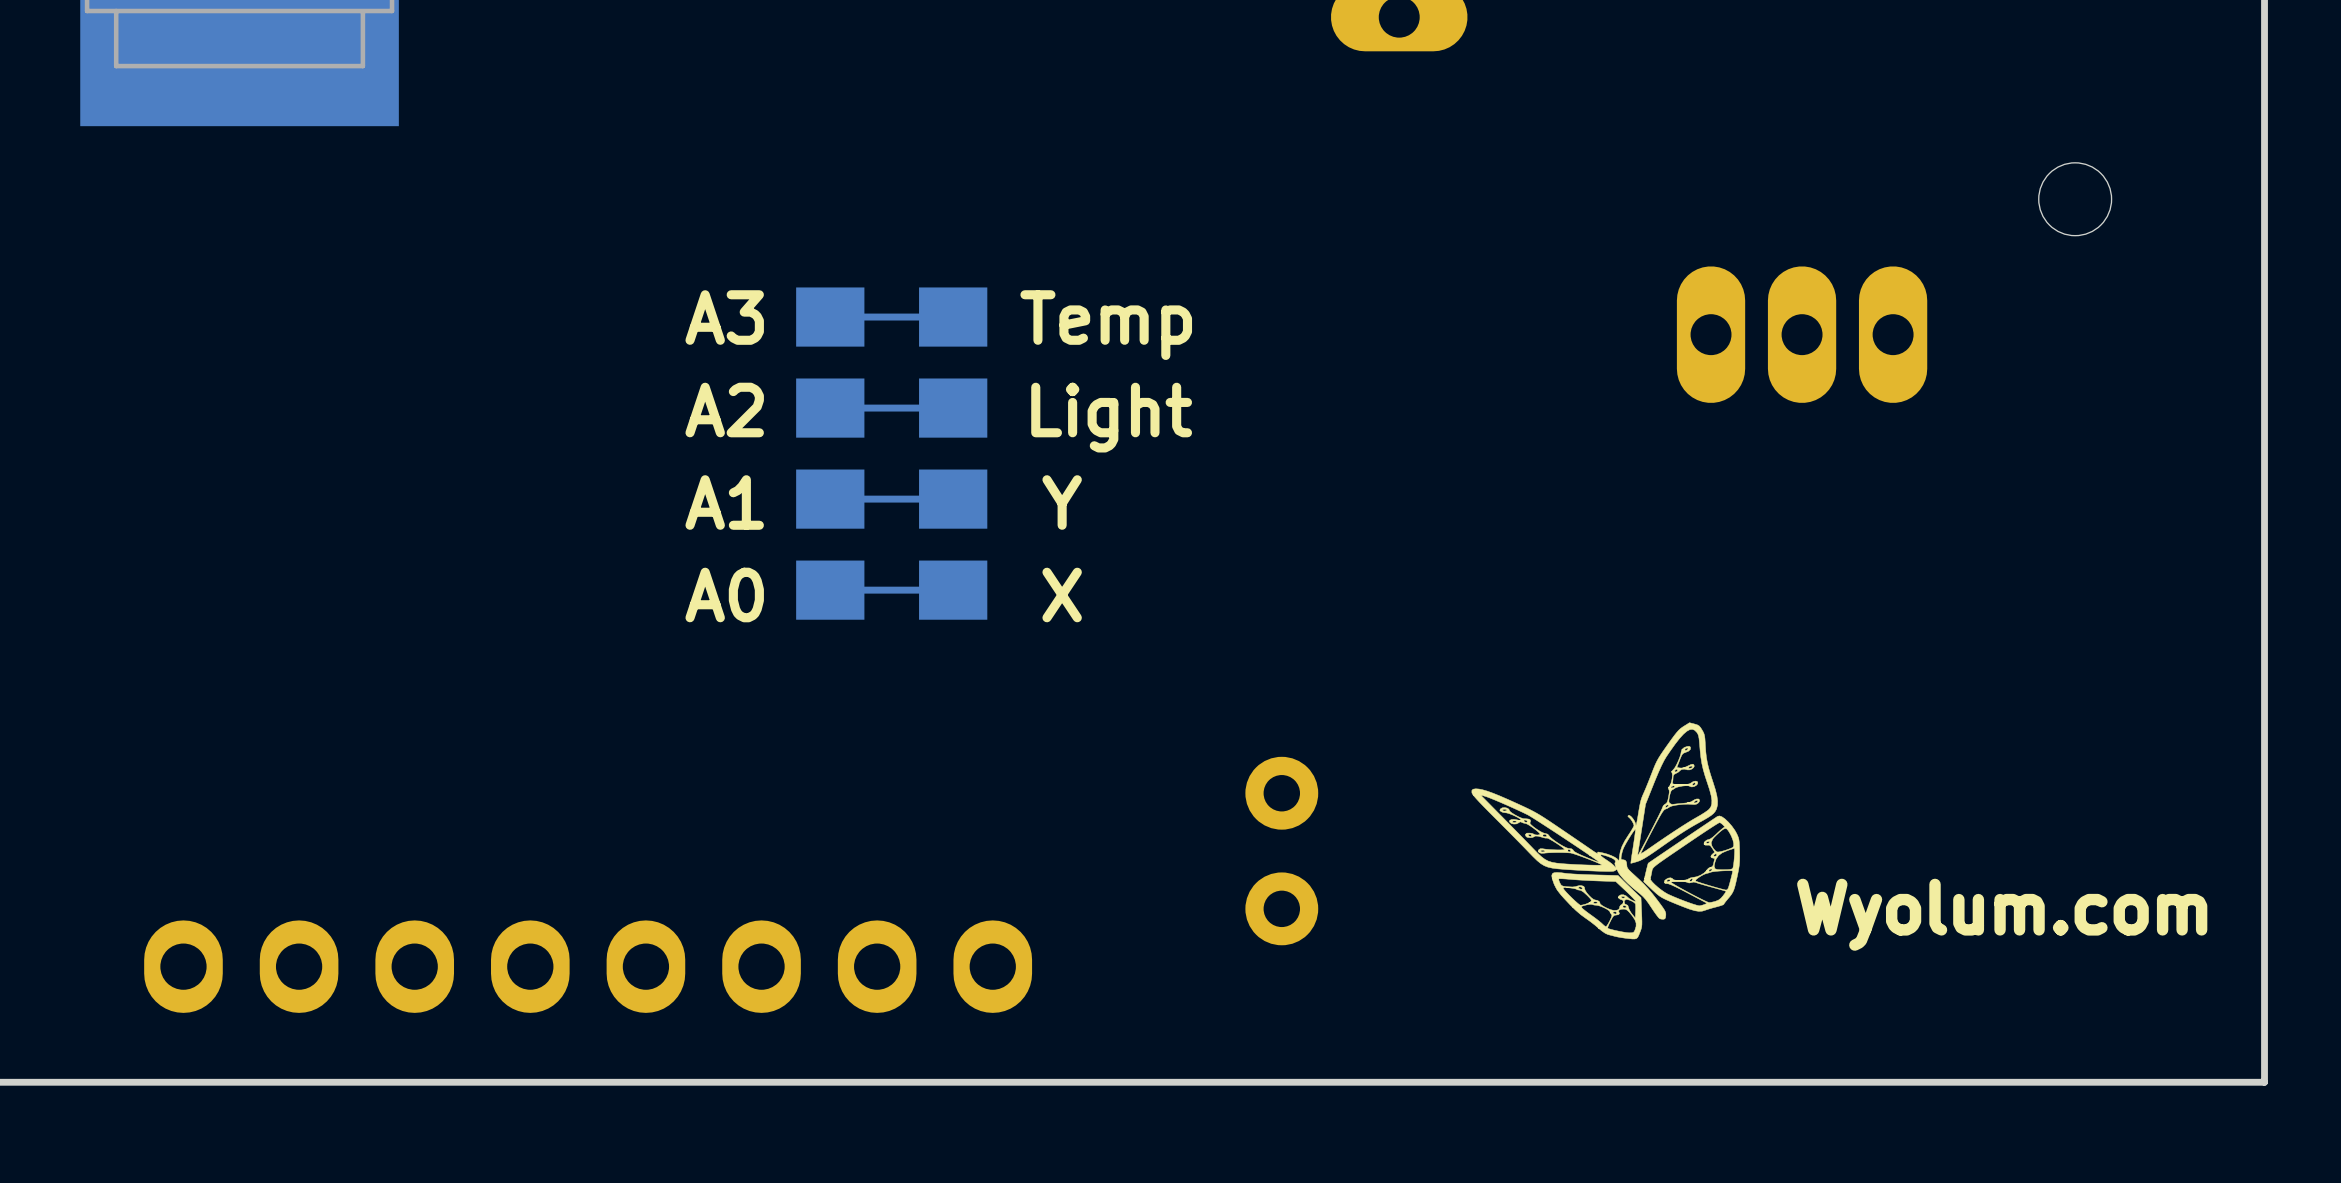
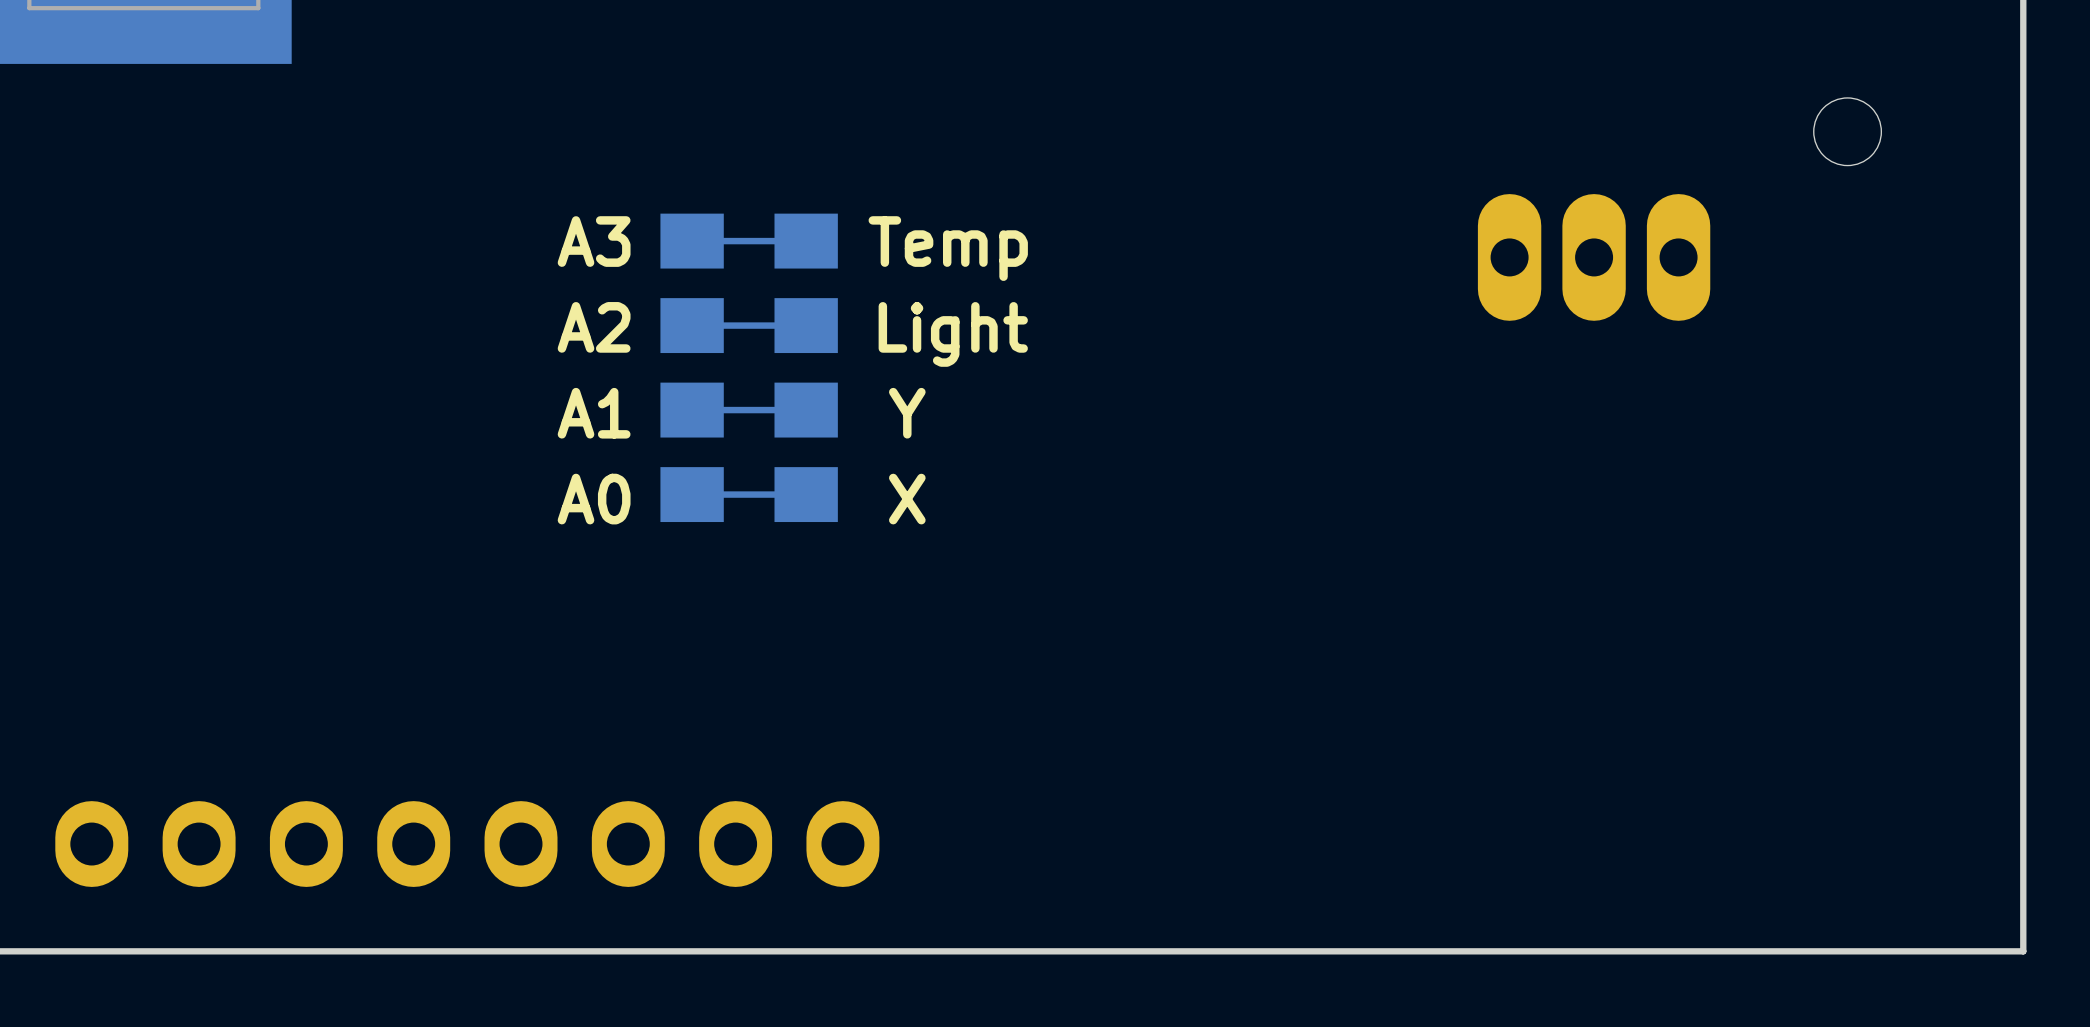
drawing: [1471, 722, 1740, 940] -> none
part: (1281, 851) -> none
text: Wyolum.com (2002, 914) -> none

